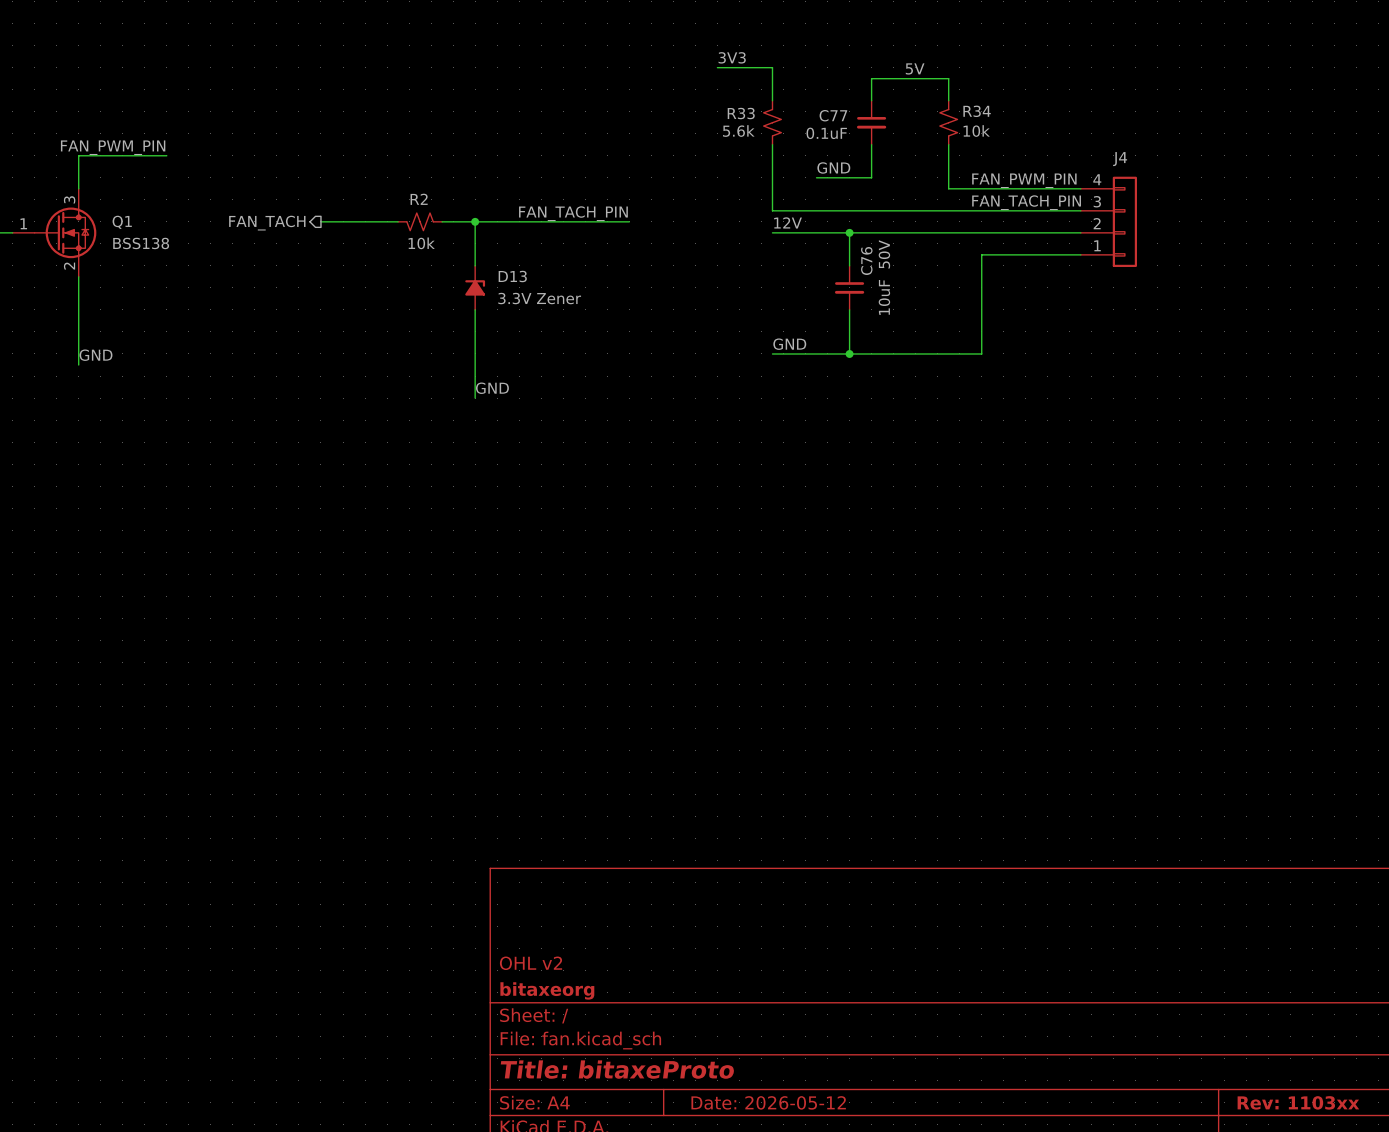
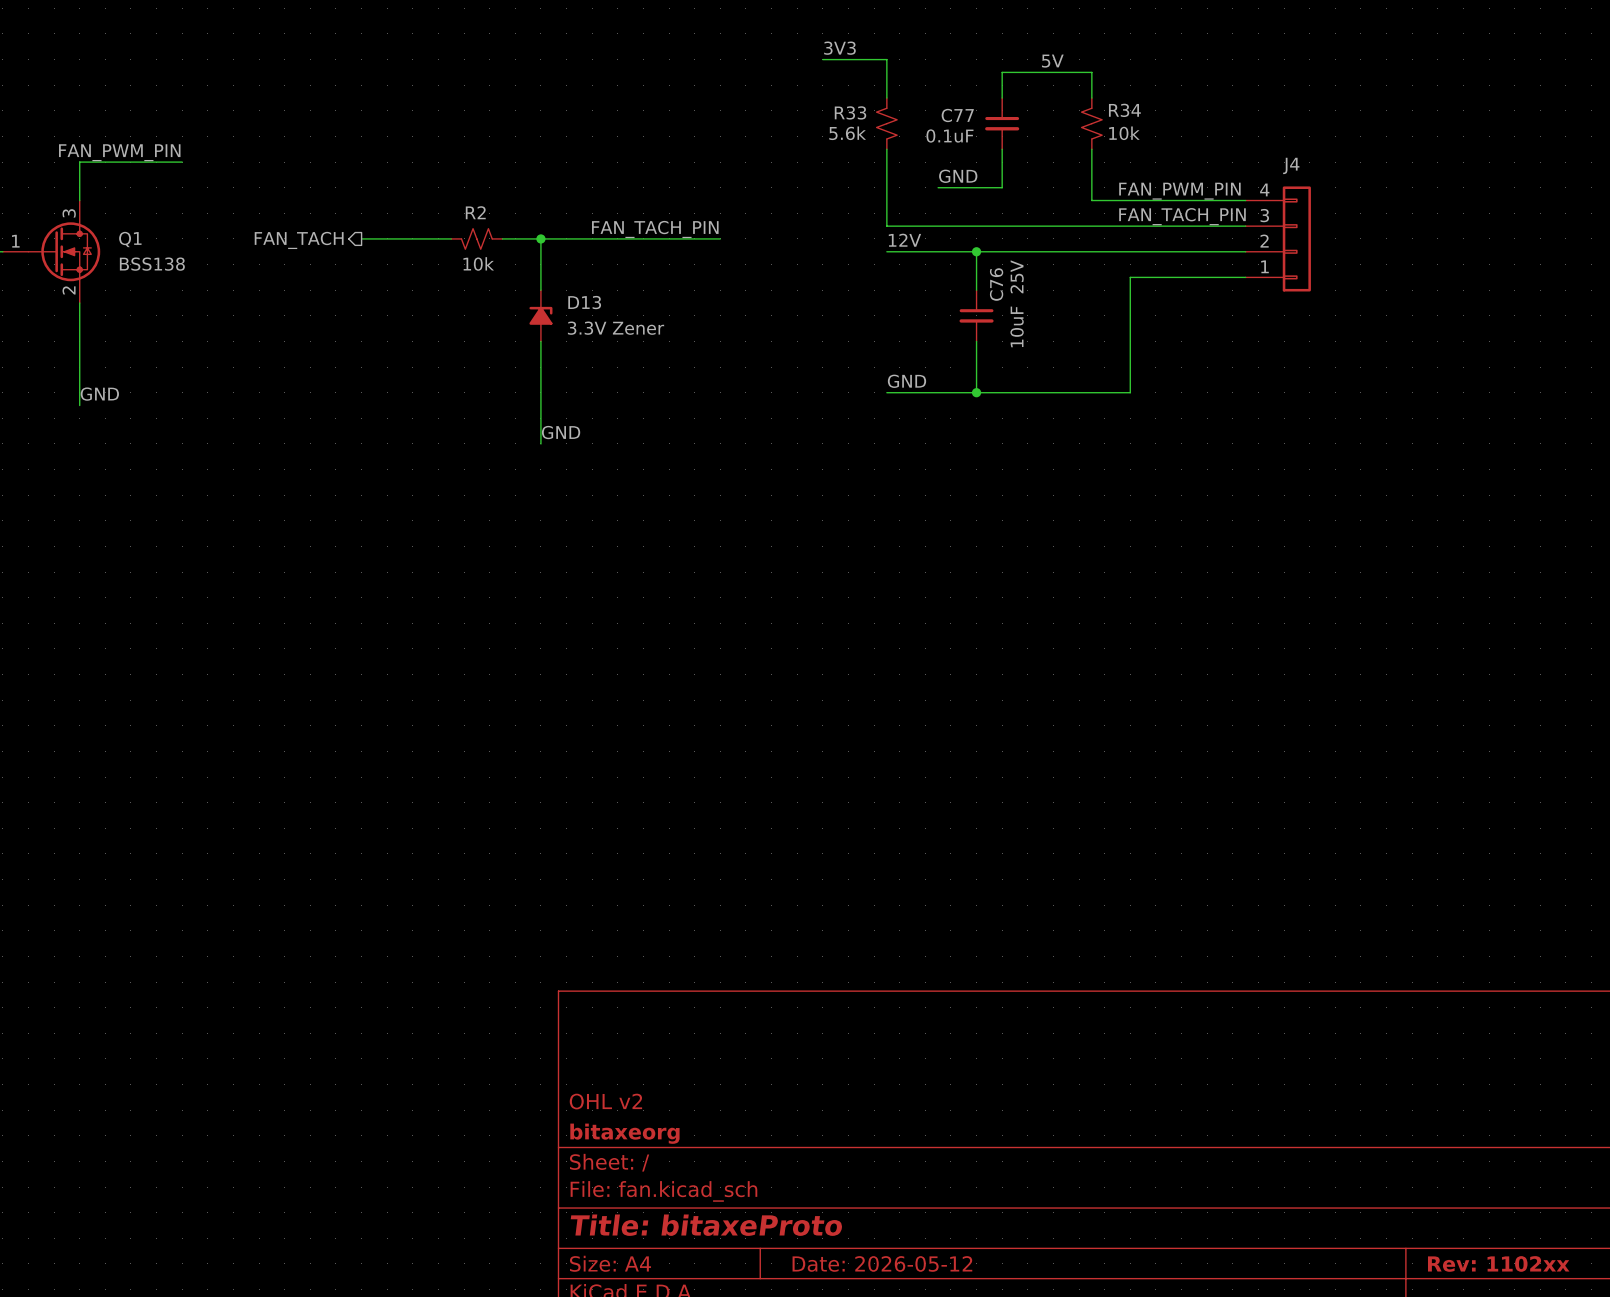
C76 text: 50V (884, 254) -> 25V (1017, 276)
title block: Rev: 1103xx (1298, 1102) -> Rev: 1102xx (1498, 1263)

